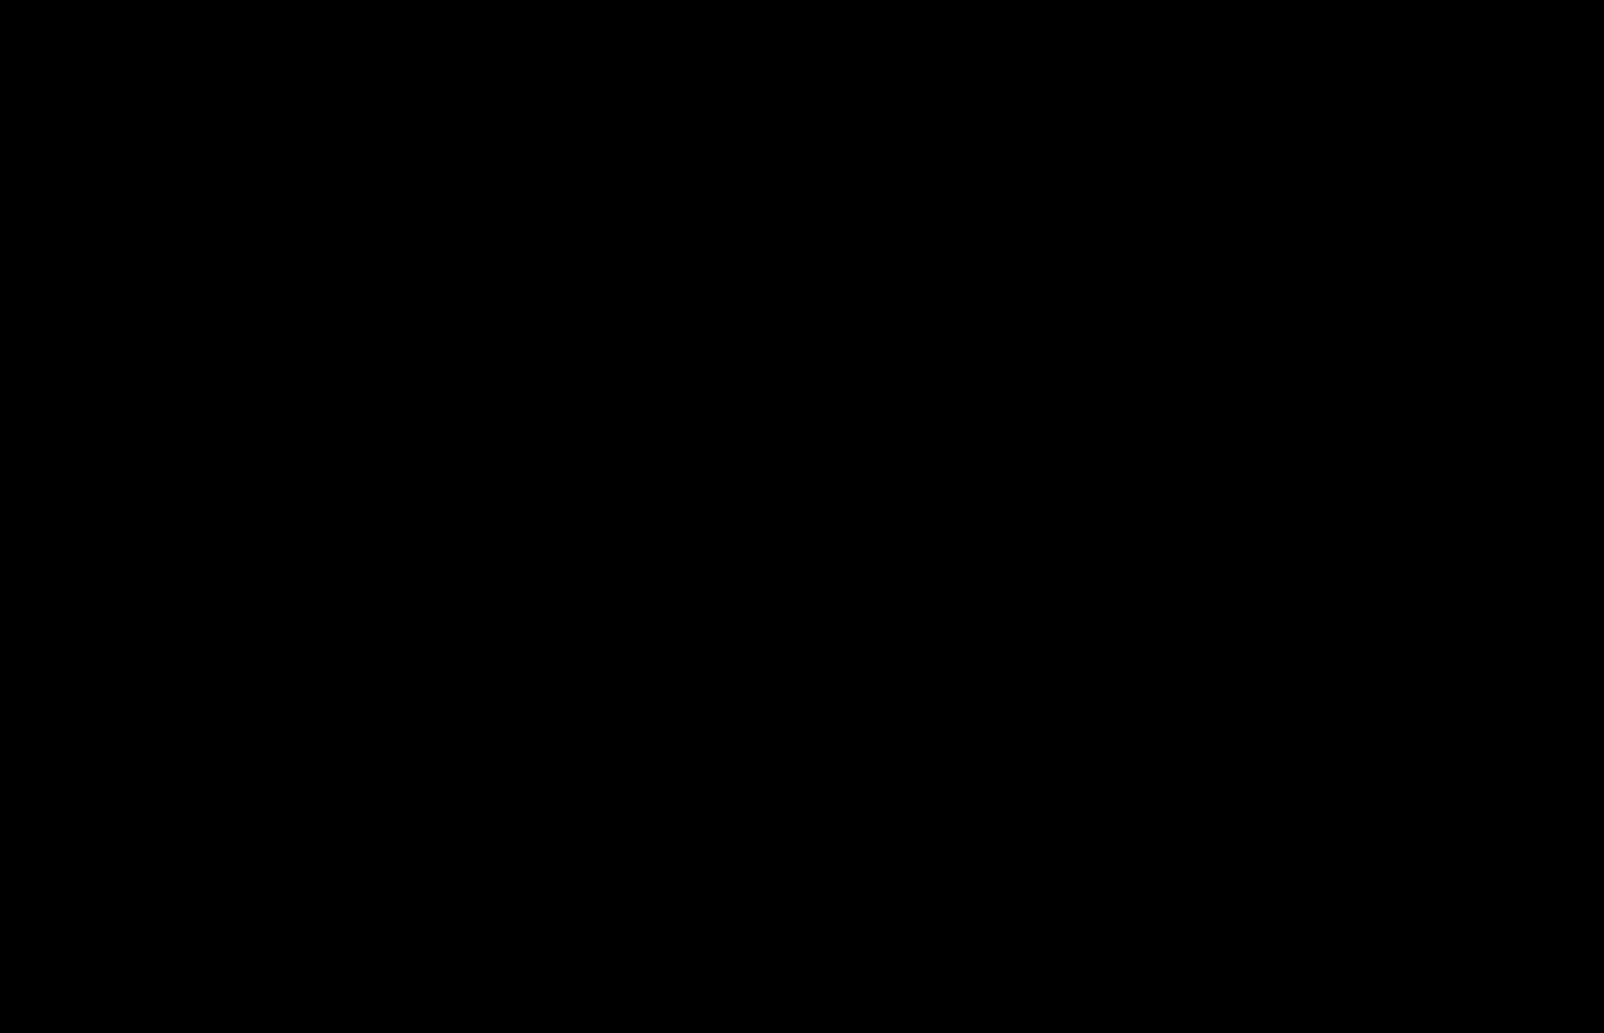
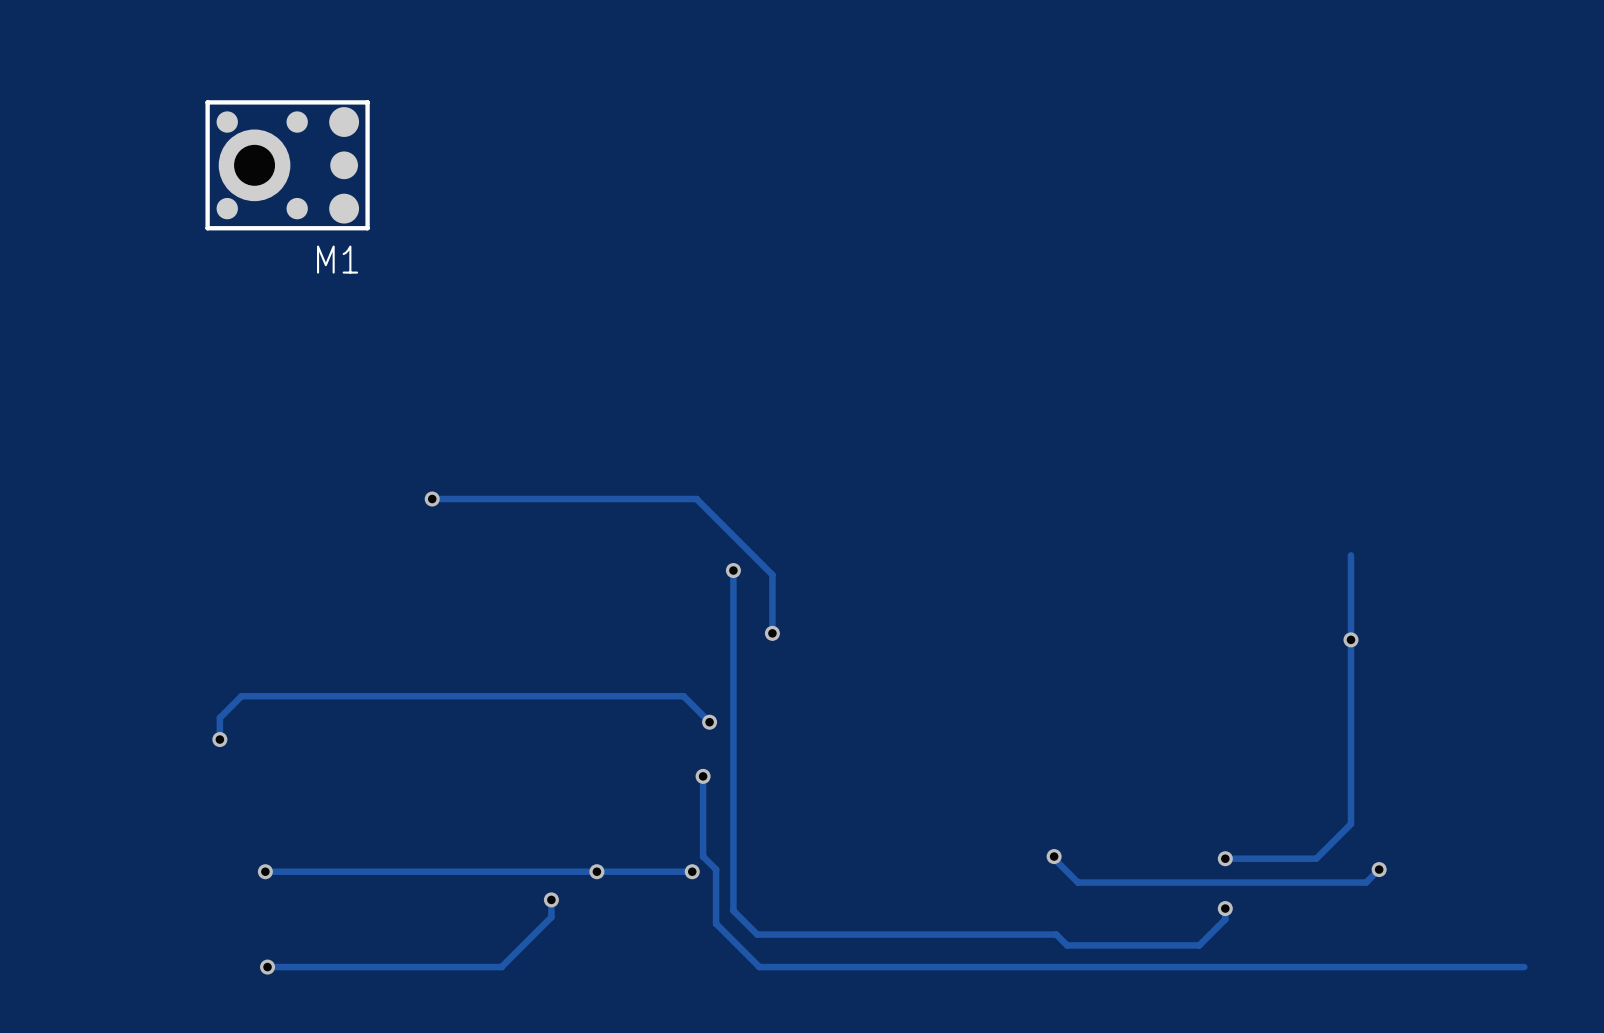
M1: none -> (287, 165)
track: none -> (432, 499) (696, 499) (772, 574) (772, 633)
via: none -> (432, 499)
track: none -> (1350, 555) (1350, 824) (1316, 858) (1225, 858)
track: none -> (733, 570) (733, 910) (757, 934) (1056, 934) (1067, 945) (1199, 945) (1225, 919) (1225, 908)
via: none -> (733, 570)
via: none -> (772, 633)
via: none -> (1350, 639)
track: none -> (709, 722) (683, 696) (241, 696) (219, 717) (219, 739)
via: none -> (709, 722)
via: none -> (219, 739)
track: none -> (703, 776) (703, 856) (716, 869) (716, 923) (759, 967) (1524, 967)
via: none -> (703, 776)
track: none -> (1054, 856) (1077, 882) (1366, 882) (1379, 869)
via: none -> (1054, 856)
via: none -> (1225, 858)
via: none -> (1379, 869)
via: none -> (265, 871)
via: none -> (596, 871)
track: none -> (692, 871) (265, 871)
via: none -> (692, 871)
track: none -> (551, 899) (551, 917) (501, 967) (267, 967)
via: none -> (551, 899)
via: none -> (1225, 908)
via: none -> (267, 967)

